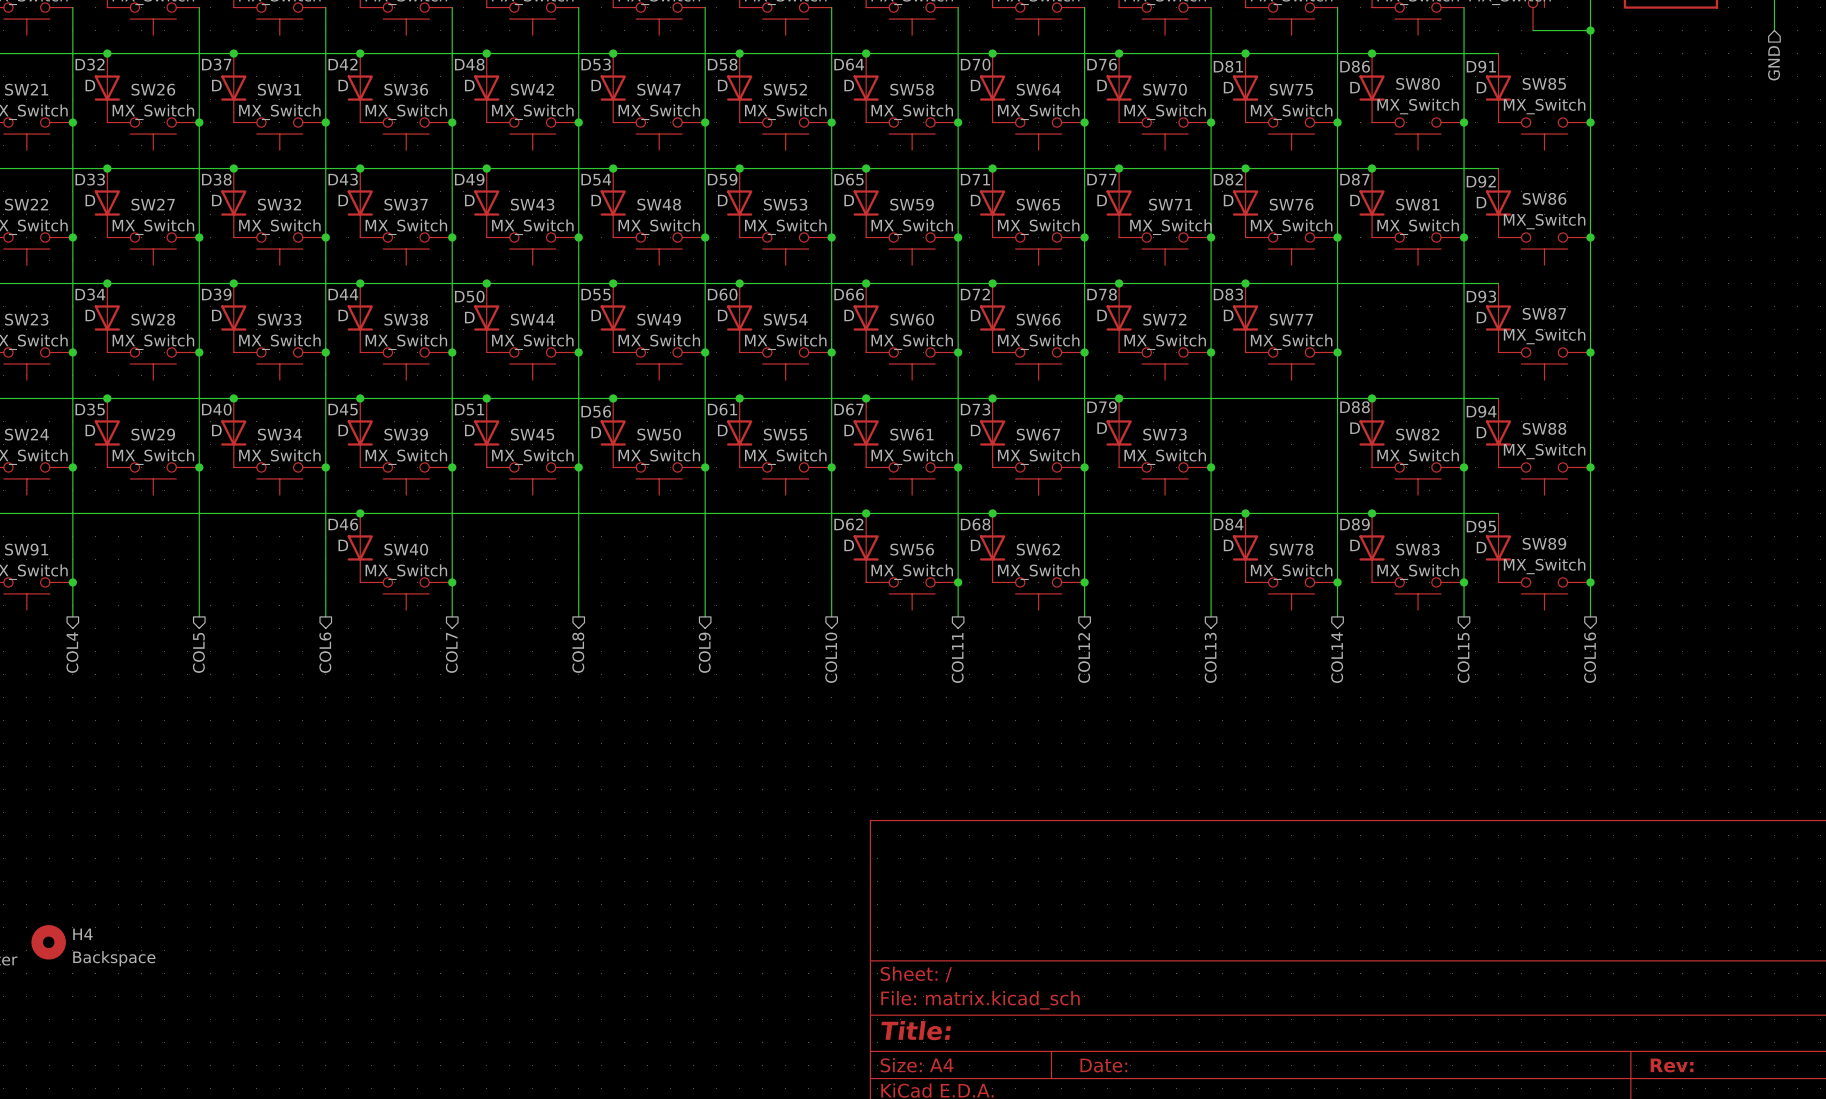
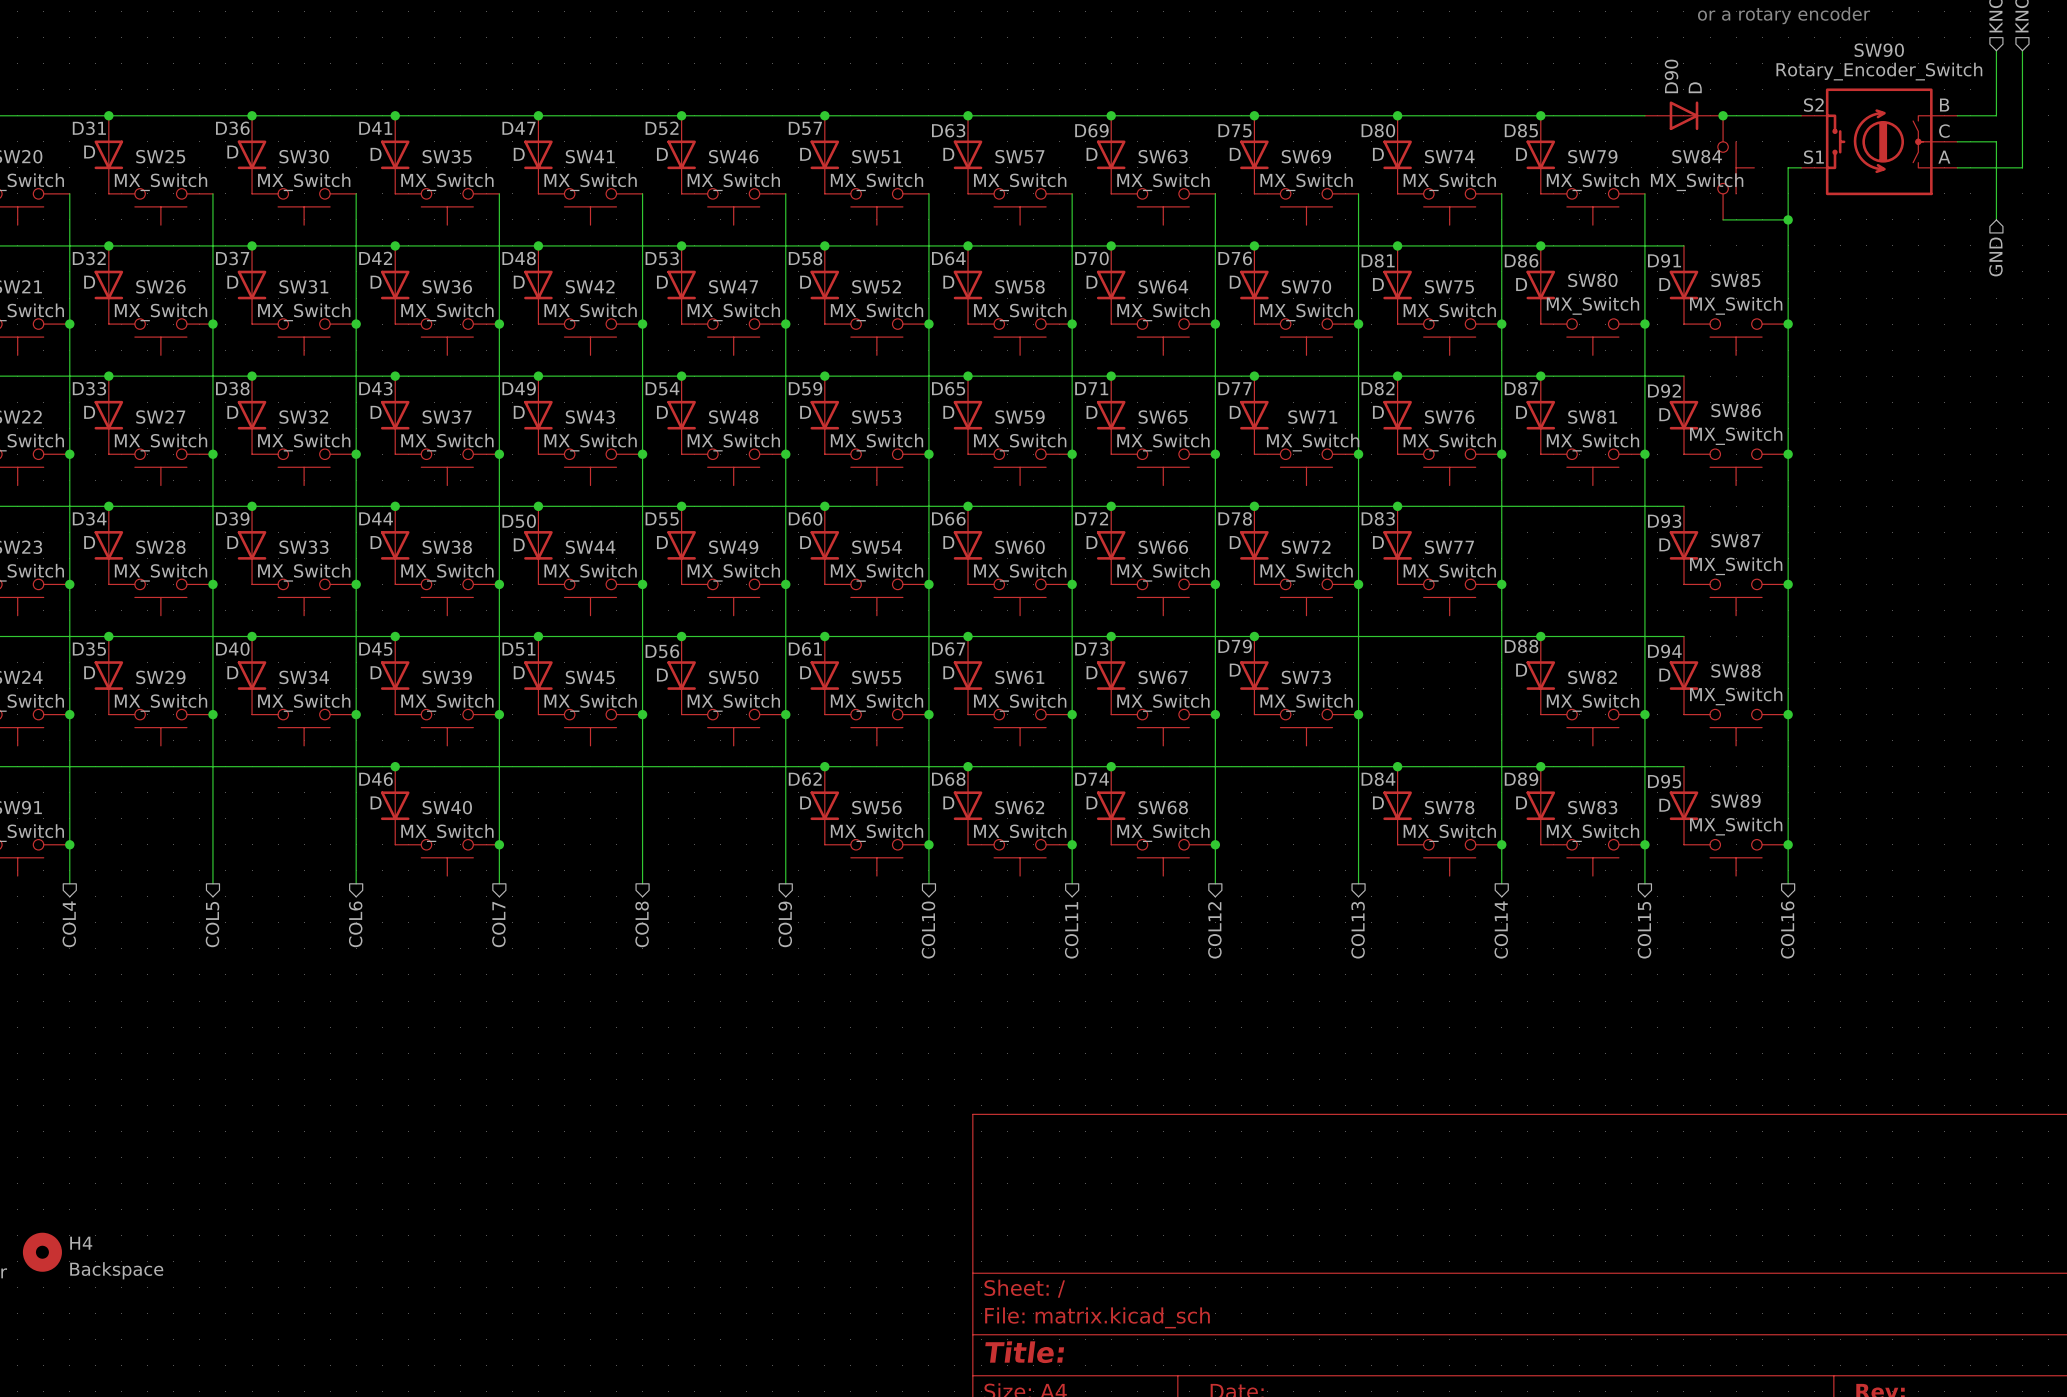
junction: none -> (824, 766)
D62 name: D62 (848, 524) -> D68 (948, 779)
D68 name: D68 (975, 524) -> D74 (1092, 779)
D62: none -> D (824, 805)
SW56 name: SW56 (912, 549) -> SW62 (1019, 807)
SW62 name: SW62 (1038, 549) -> SW68 (1163, 807)
junction: none -> (928, 844)
SW56: none -> MX_Switch (876, 857)

